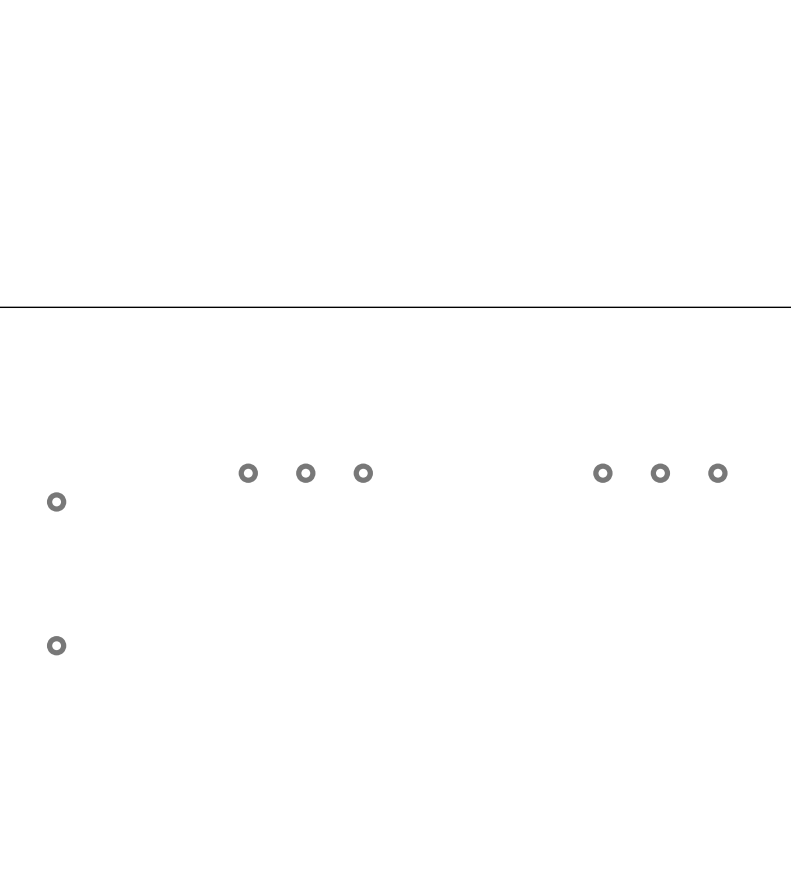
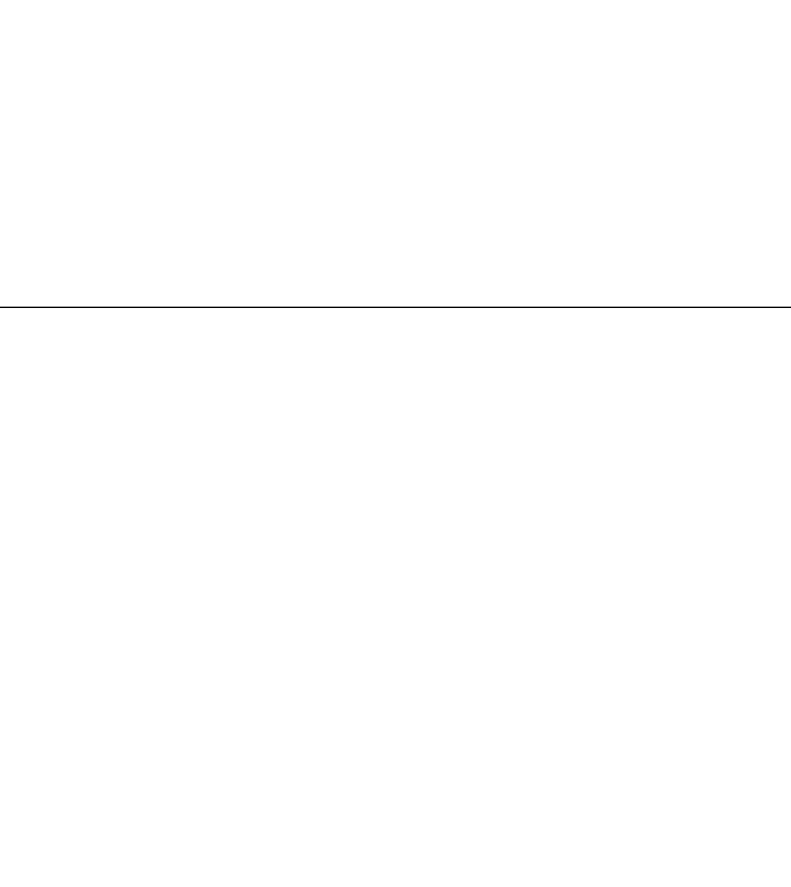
via: (248, 473) -> none
via: (305, 473) -> none
via: (363, 473) -> none
via: (602, 473) -> none
via: (660, 473) -> none
via: (717, 473) -> none
via: (56, 501) -> none
via: (56, 645) -> none

